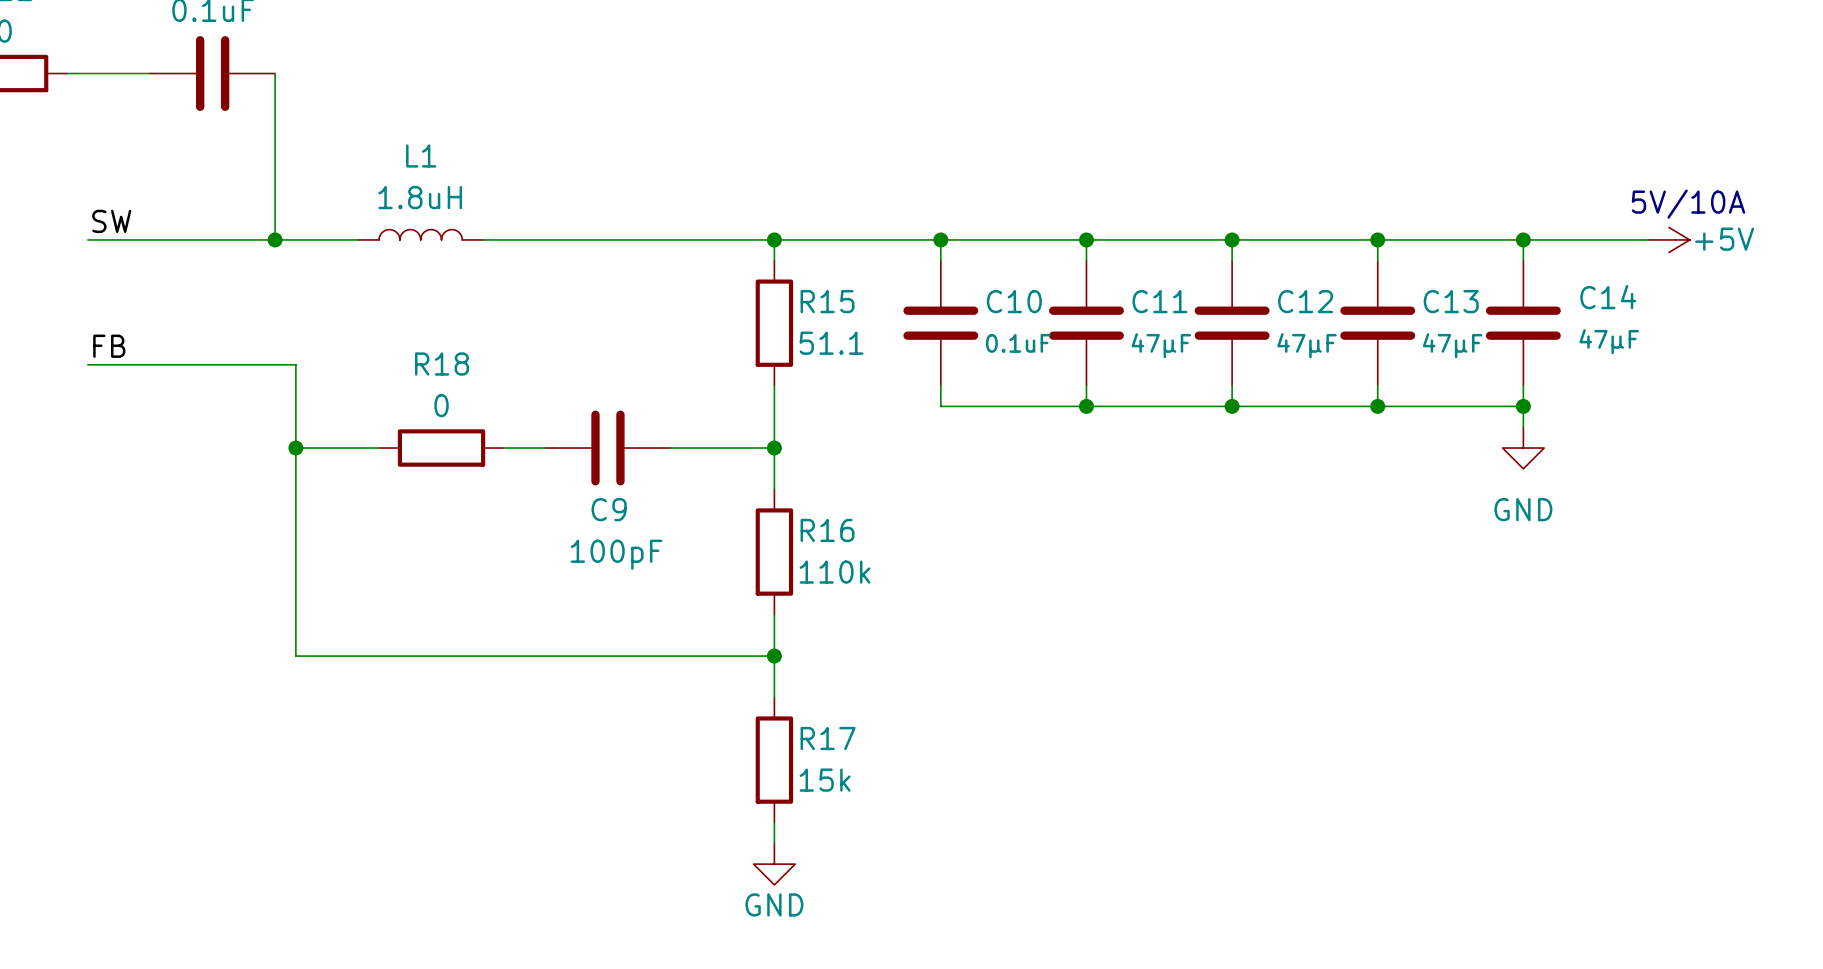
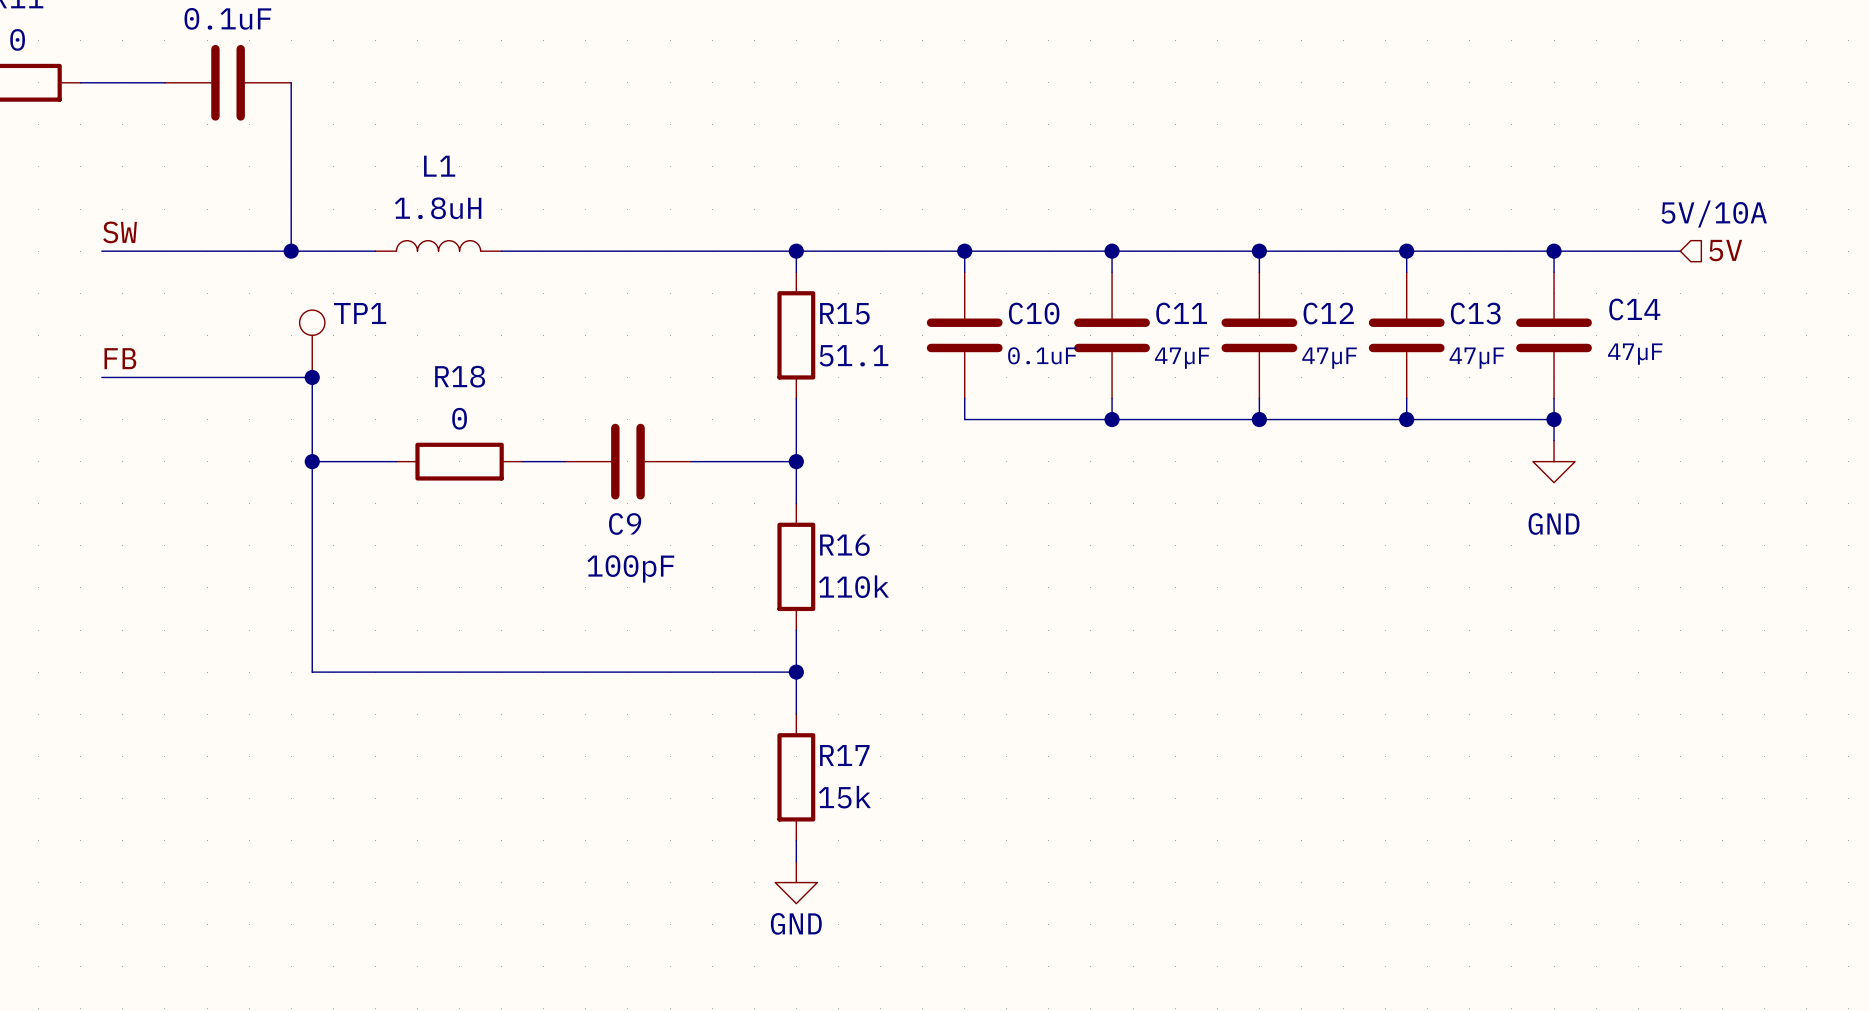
power symbol: +5V (1669, 239) -> none
hierarchical label: none -> 5V (1725, 250)
TP1: none -> (312, 343)
junction: none -> (312, 377)

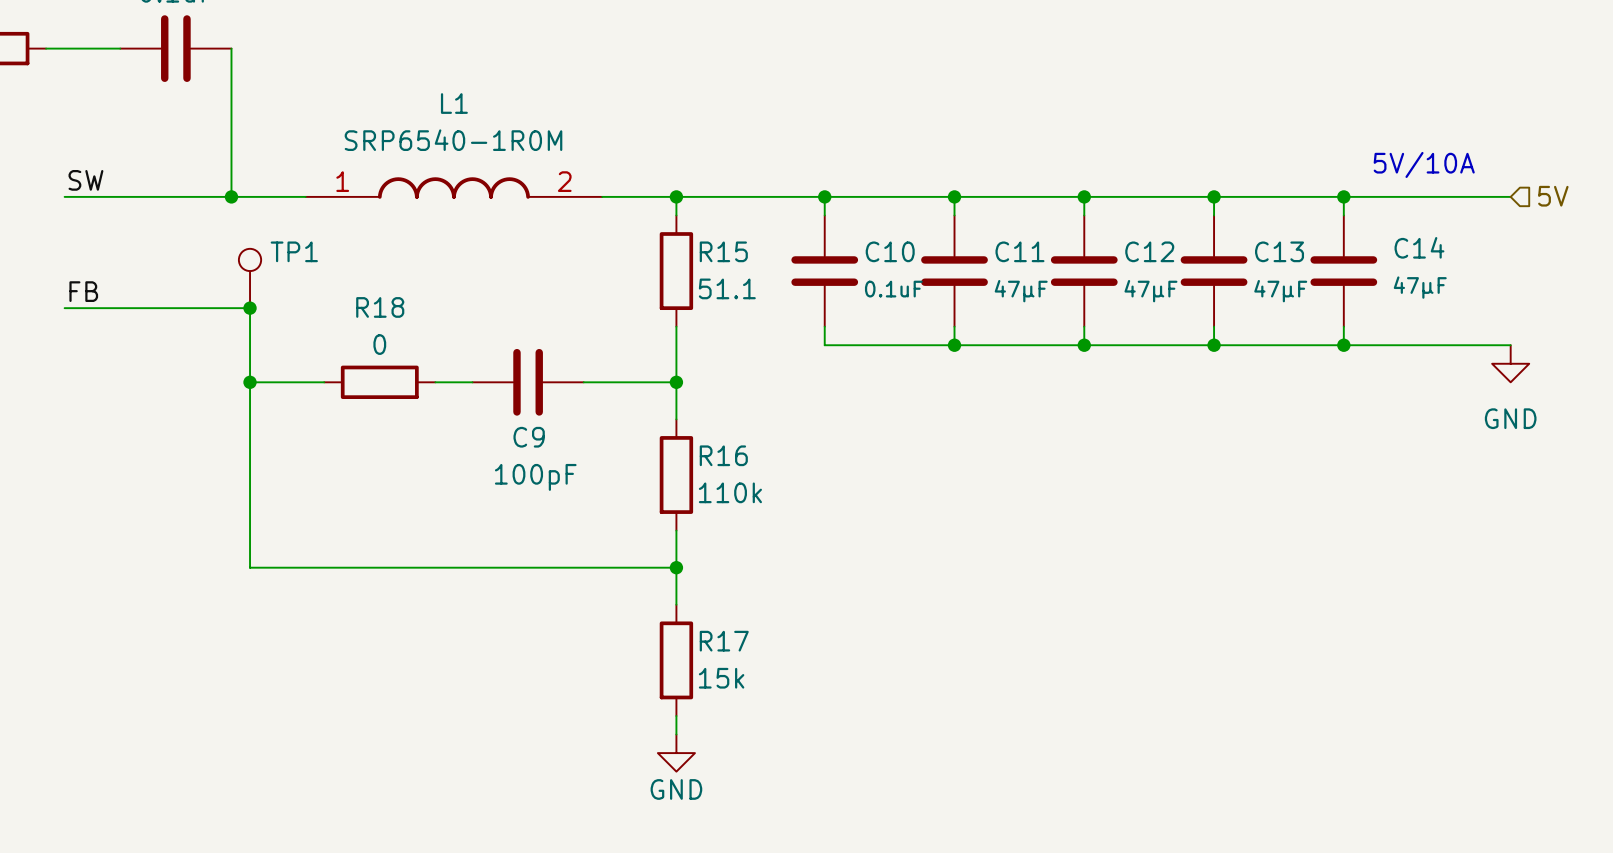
L1 value: 1.8uH (438, 208) -> SRP6540-1R0M (453, 140)
text position: 5V/10A (1714, 214) -> 5V/10A (1424, 164)
L1 symbol: [375, 240, 502, 252] -> [305, 177, 603, 199]
hierarchical label position: 5V (1725, 250) -> 5V (1553, 196)
wire: (501, 251) (712, 251) -> none
wire: none -> (1455, 196) (1510, 196)
wire: (1554, 419) (1554, 440) -> (1343, 345) (1510, 345)
power symbol position: GND (1554, 461) -> GND (1510, 363)

